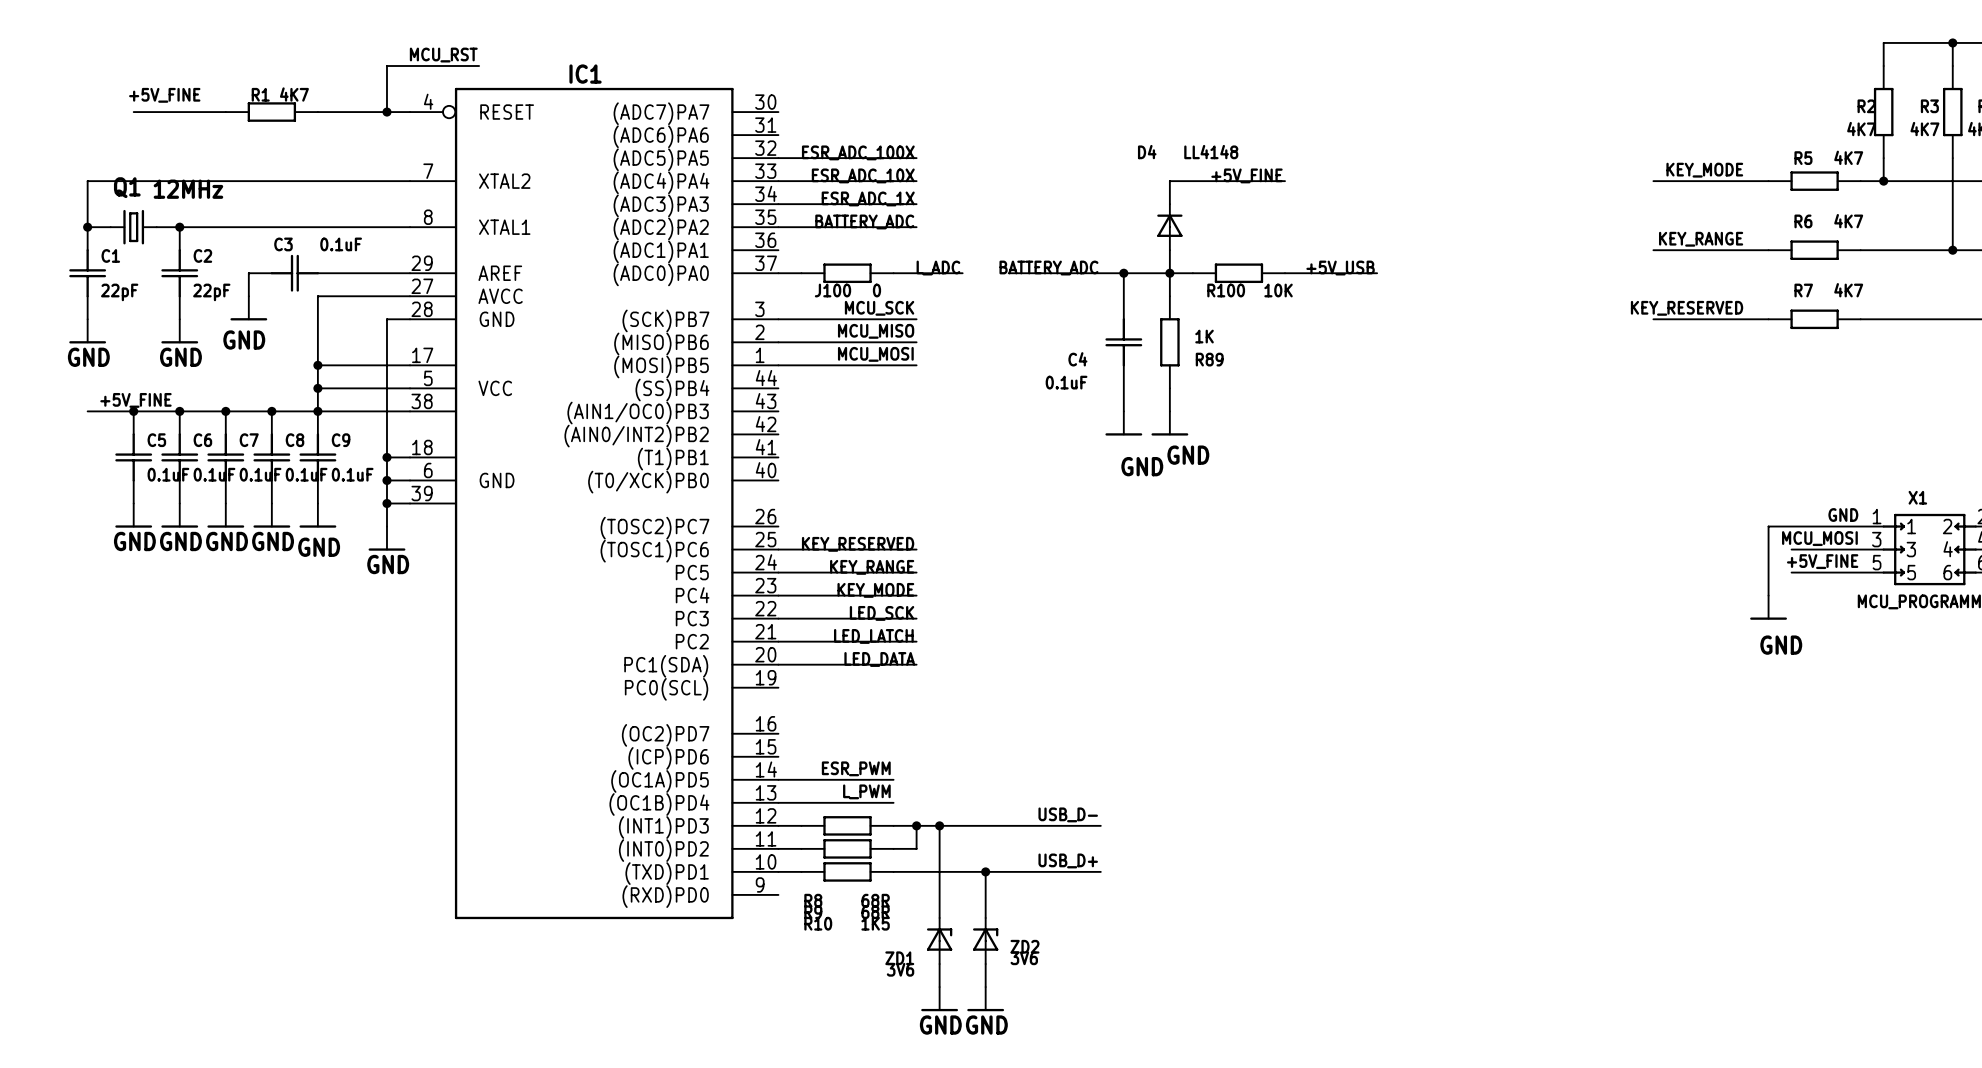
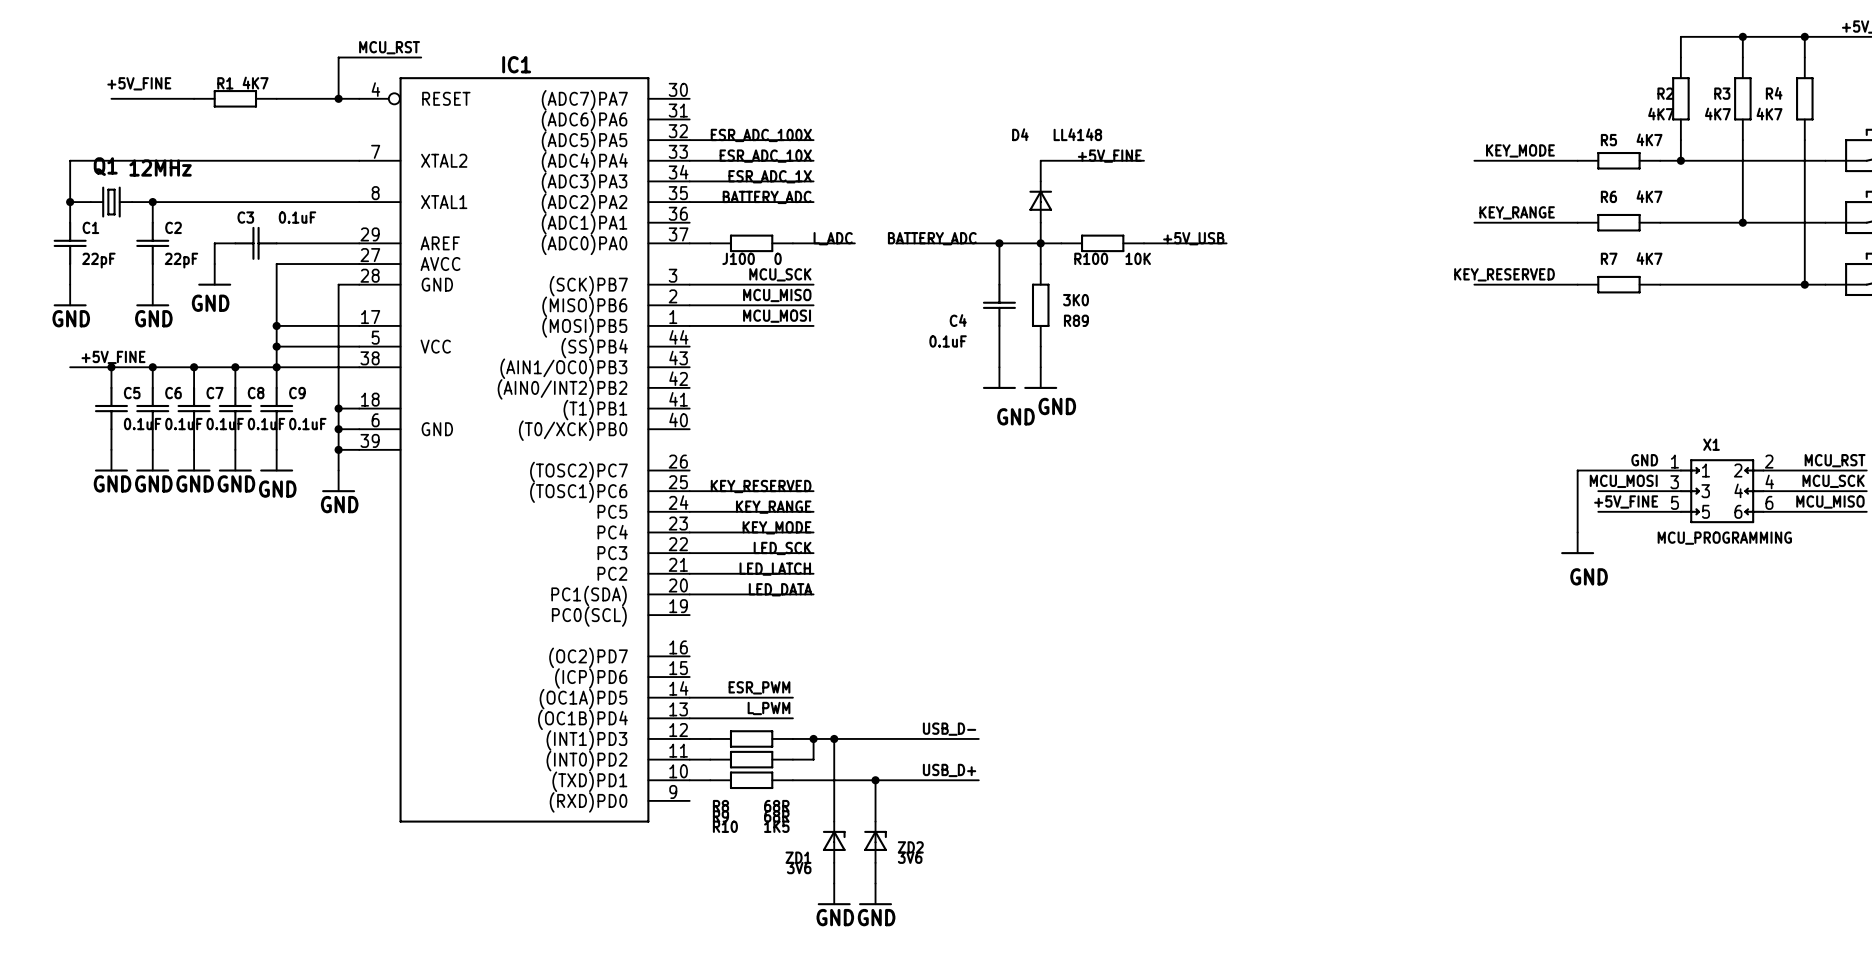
R89 value: 1K (1204, 336) -> 3K0 (1076, 300)

